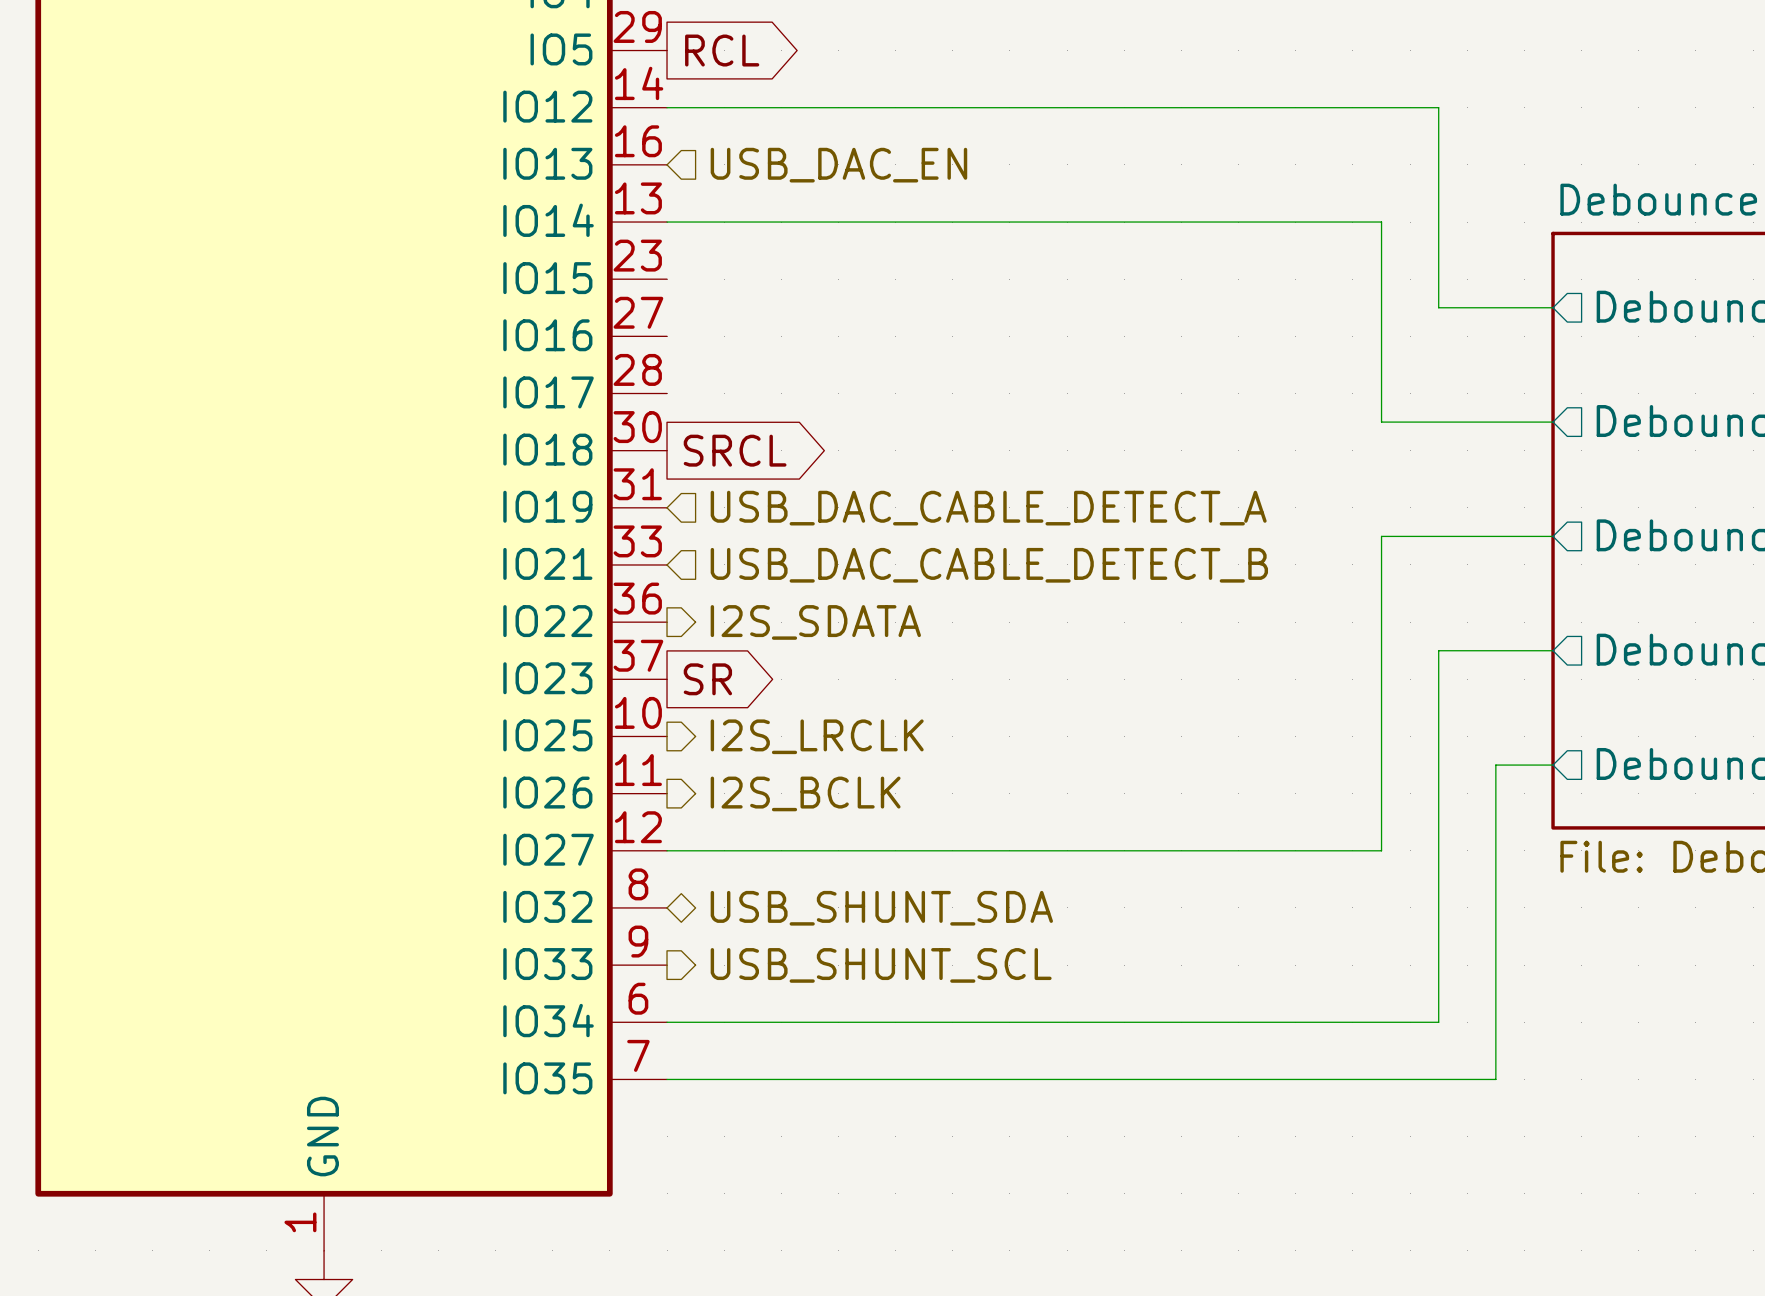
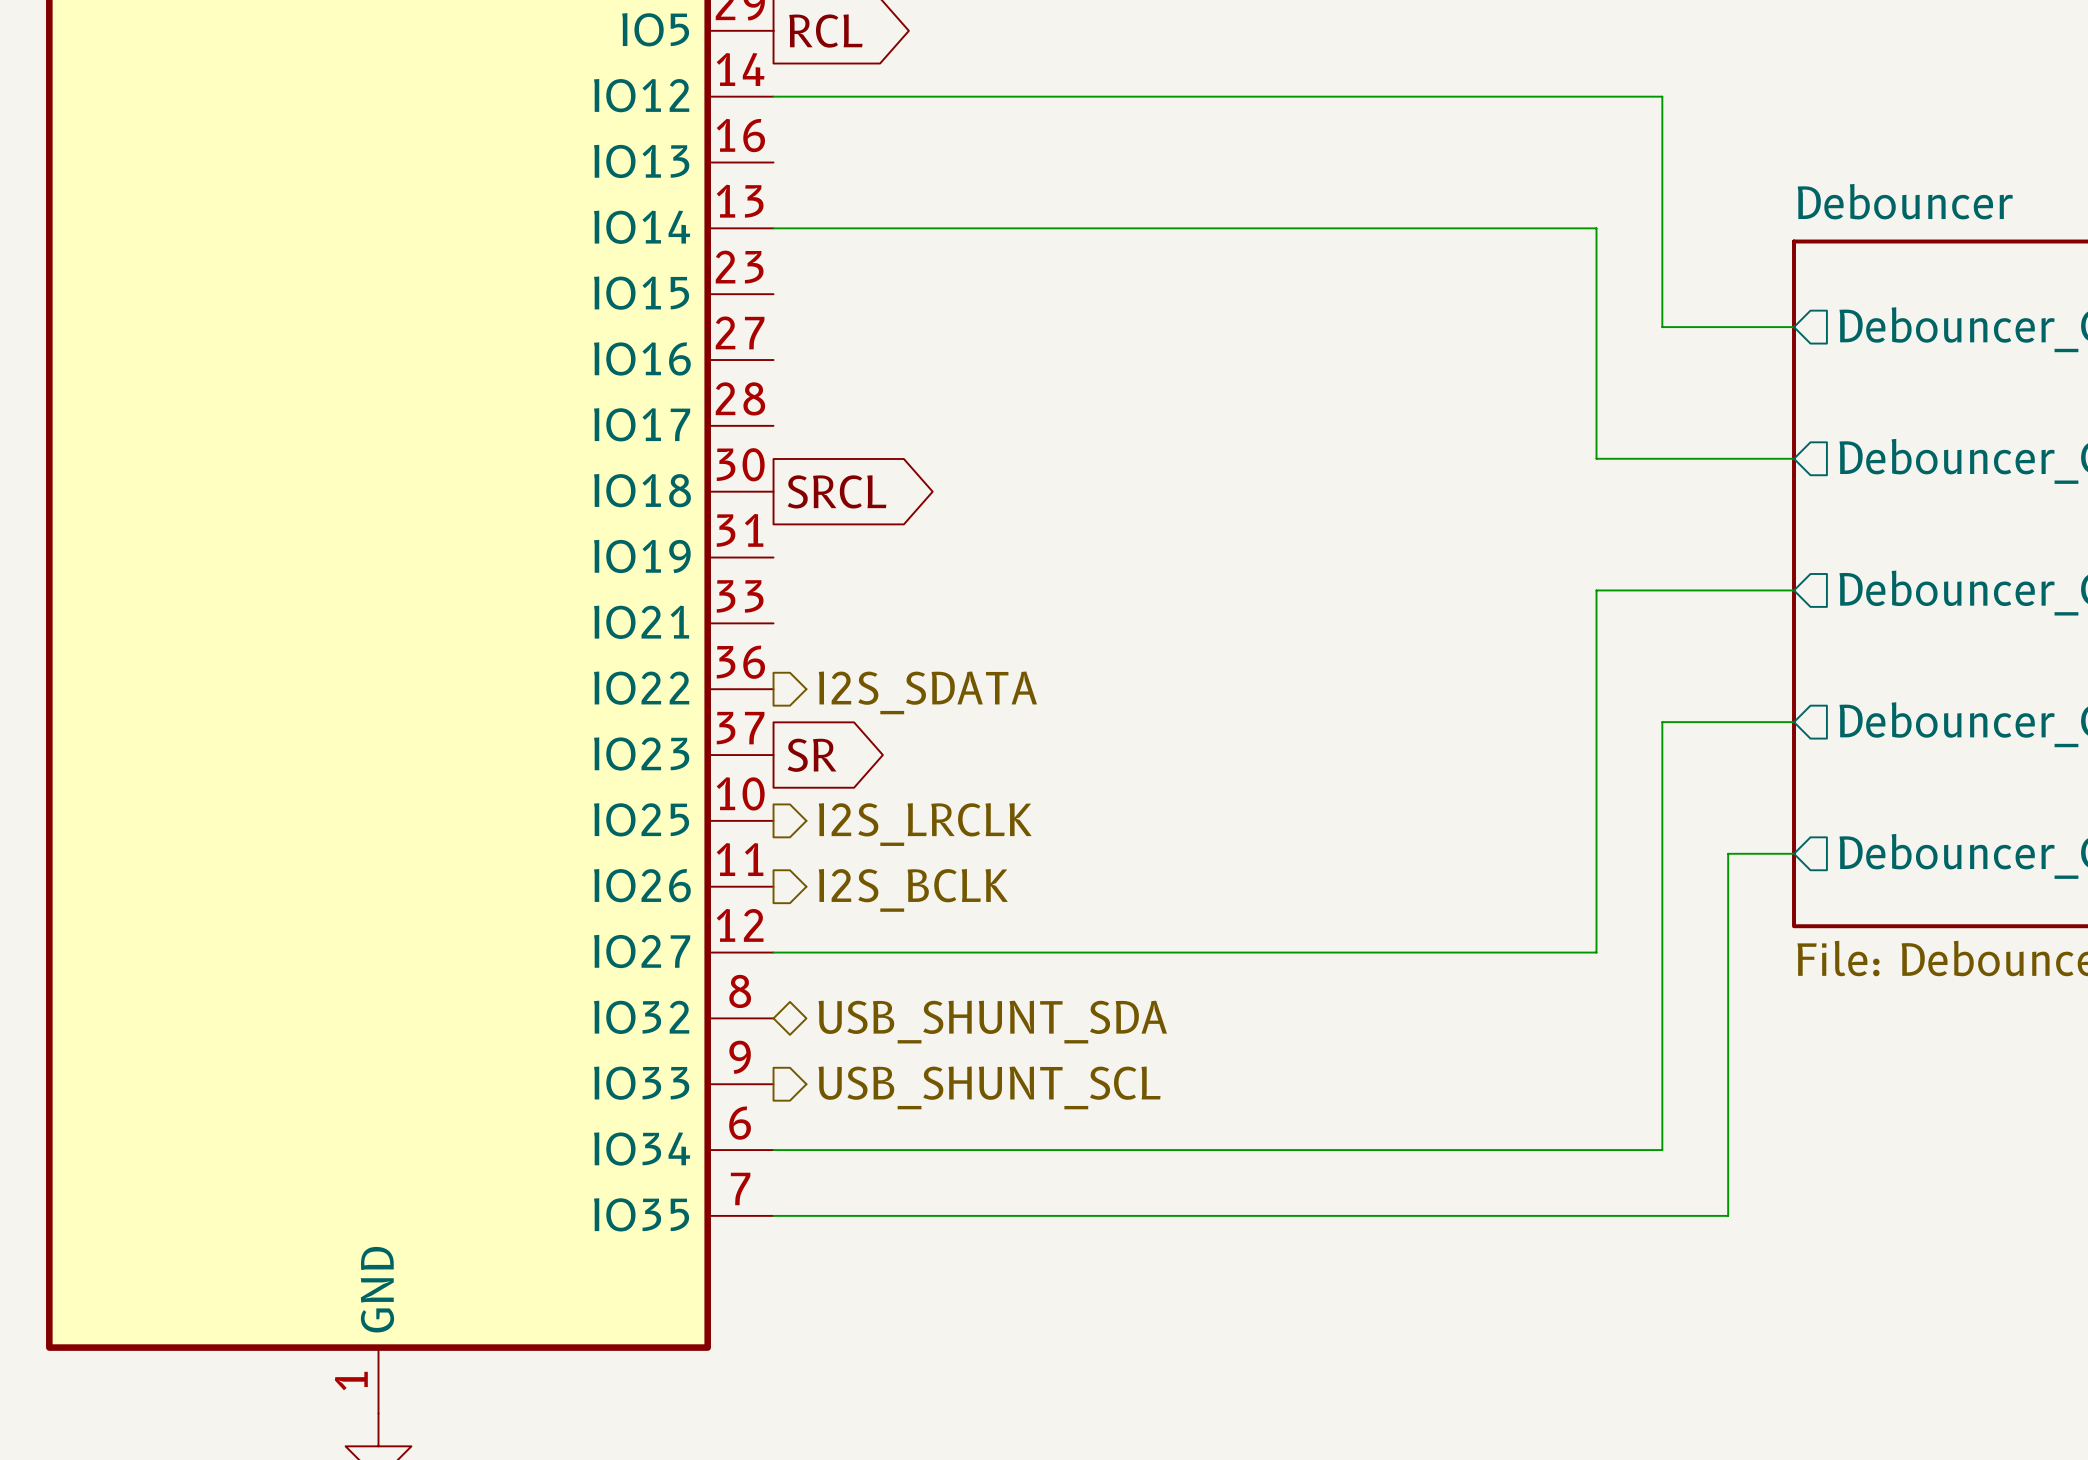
hierarchical label: USB_DAC_EN (838, 165) -> none
hierarchical label: USB_DAC_CABLE_DETECT_A (988, 508) -> none
hierarchical label: USB_DAC_CABLE_DETECT_B (989, 565) -> none

